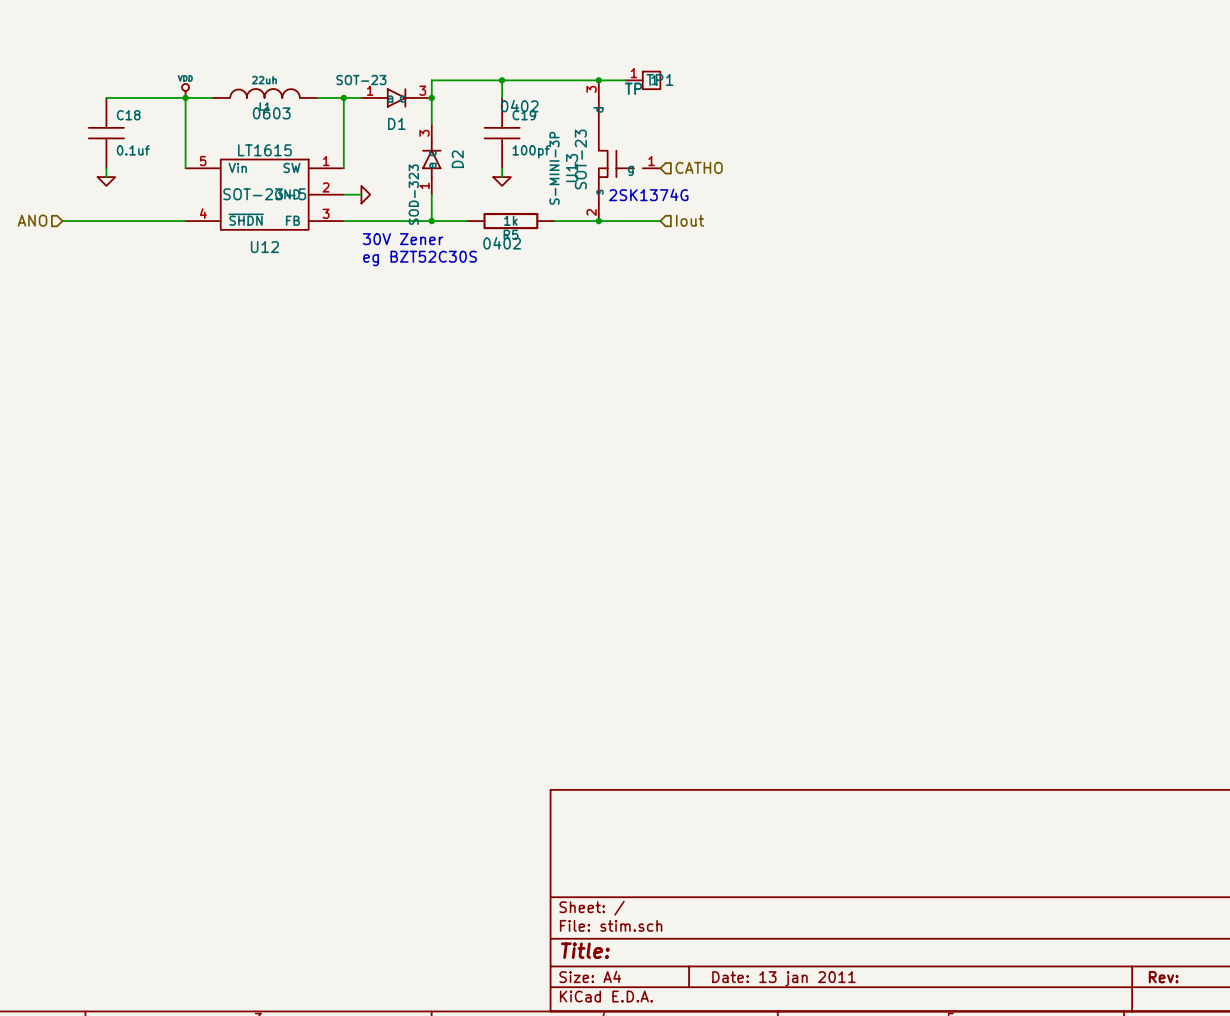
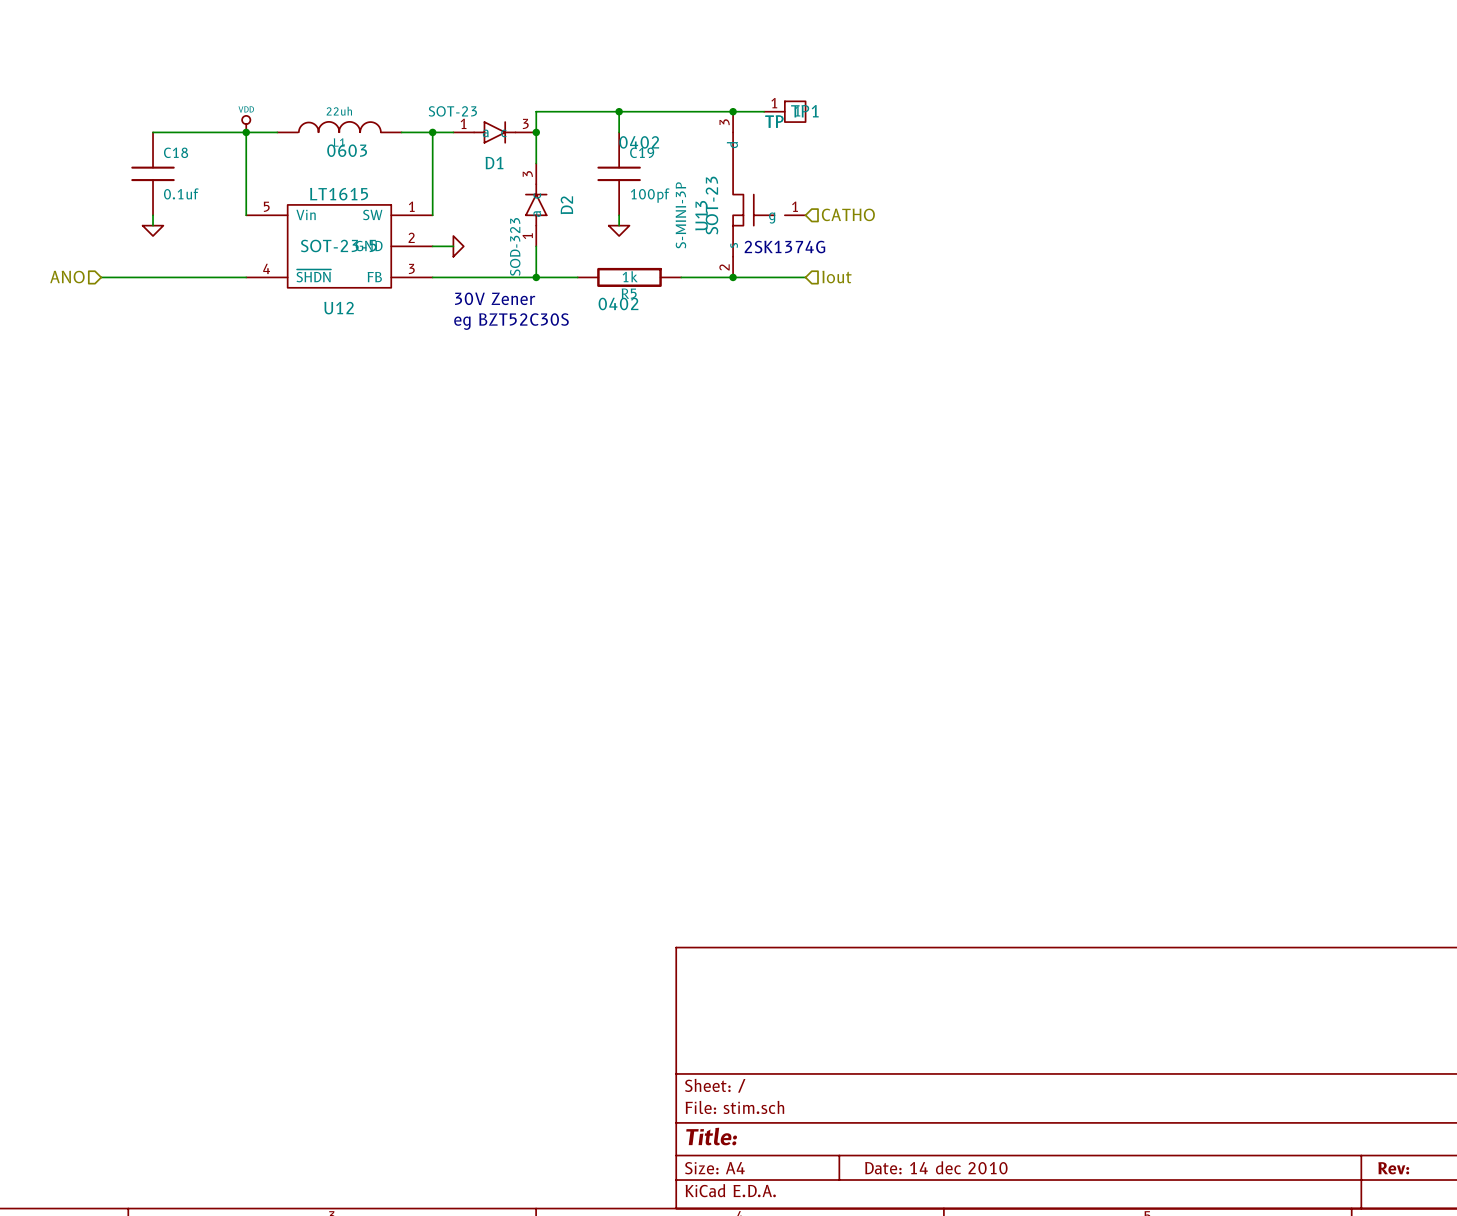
title block: Date: 13 jan 2011 (783, 978) -> Date: 14 dec 2010 (936, 1167)

